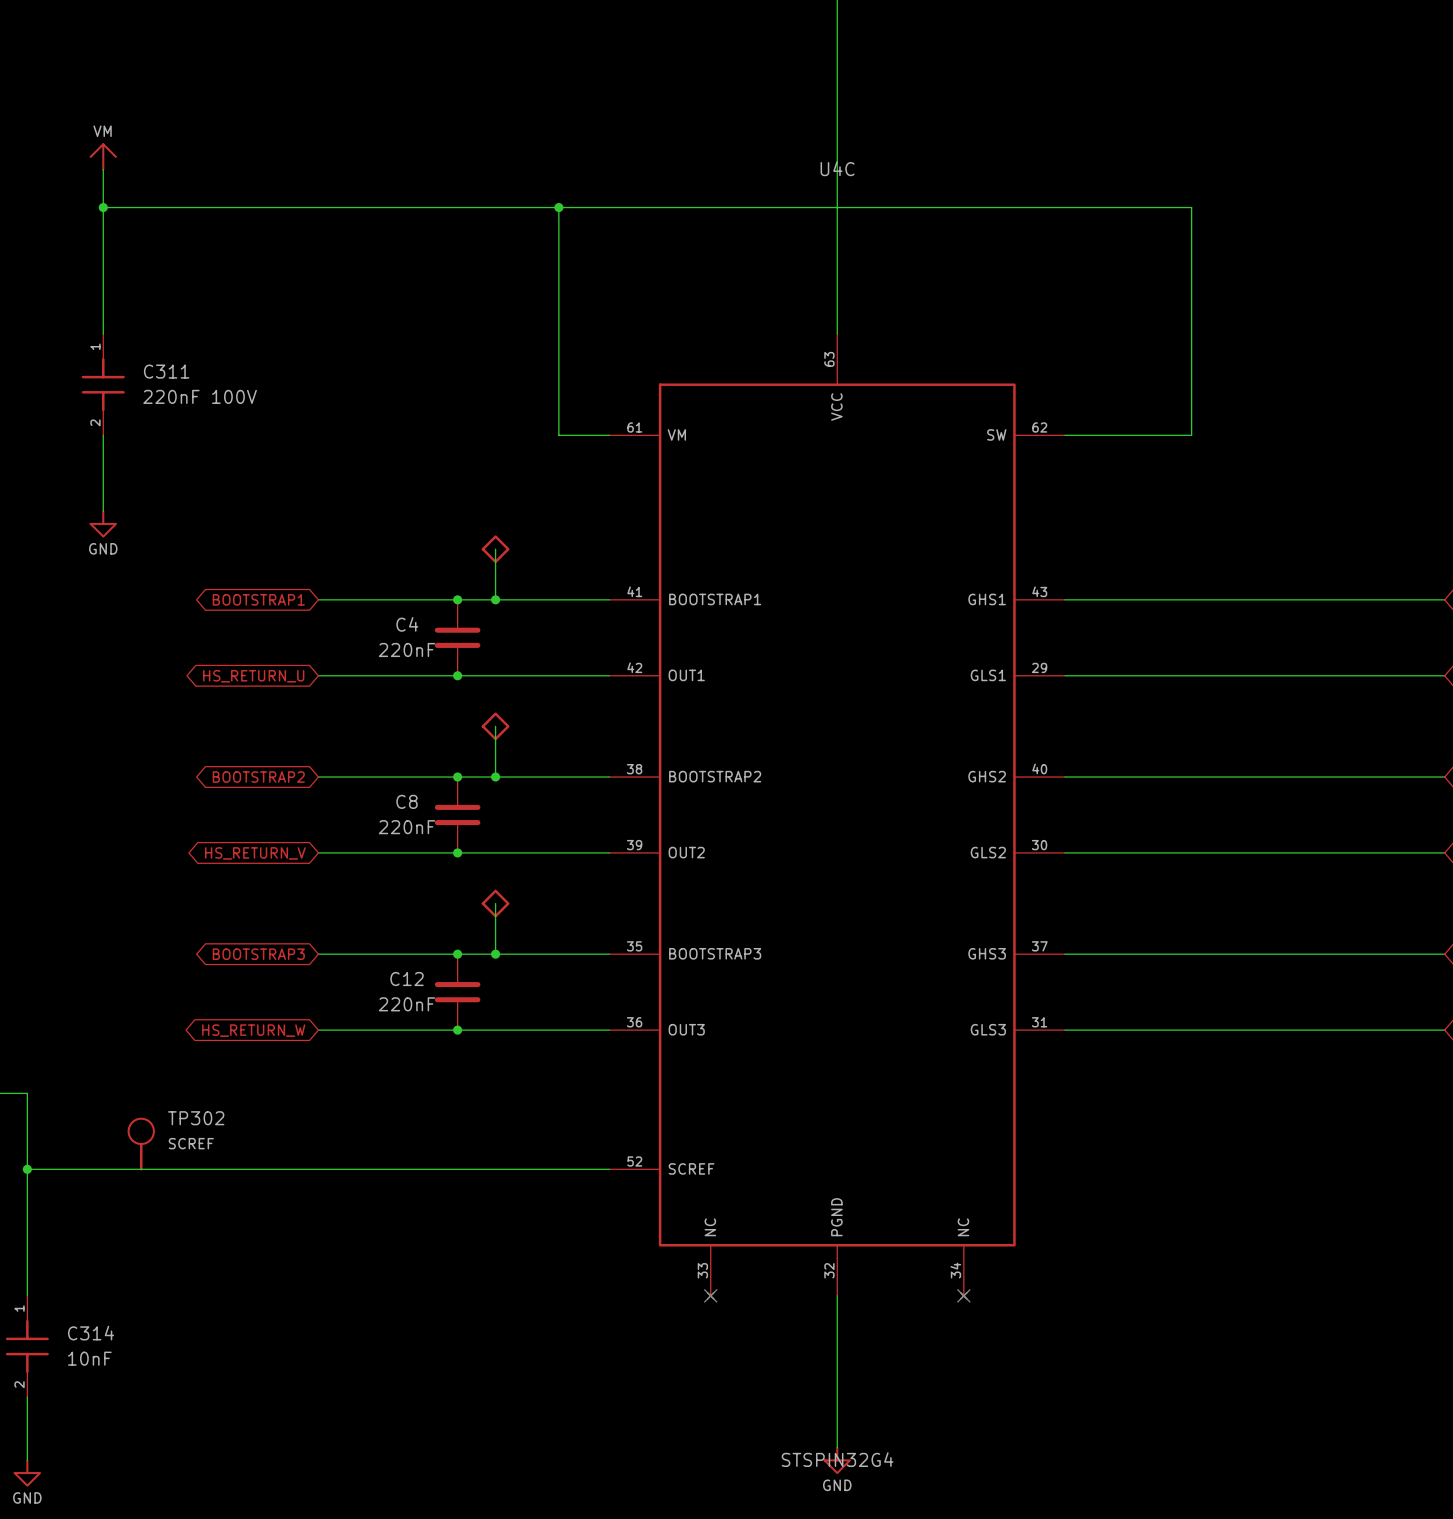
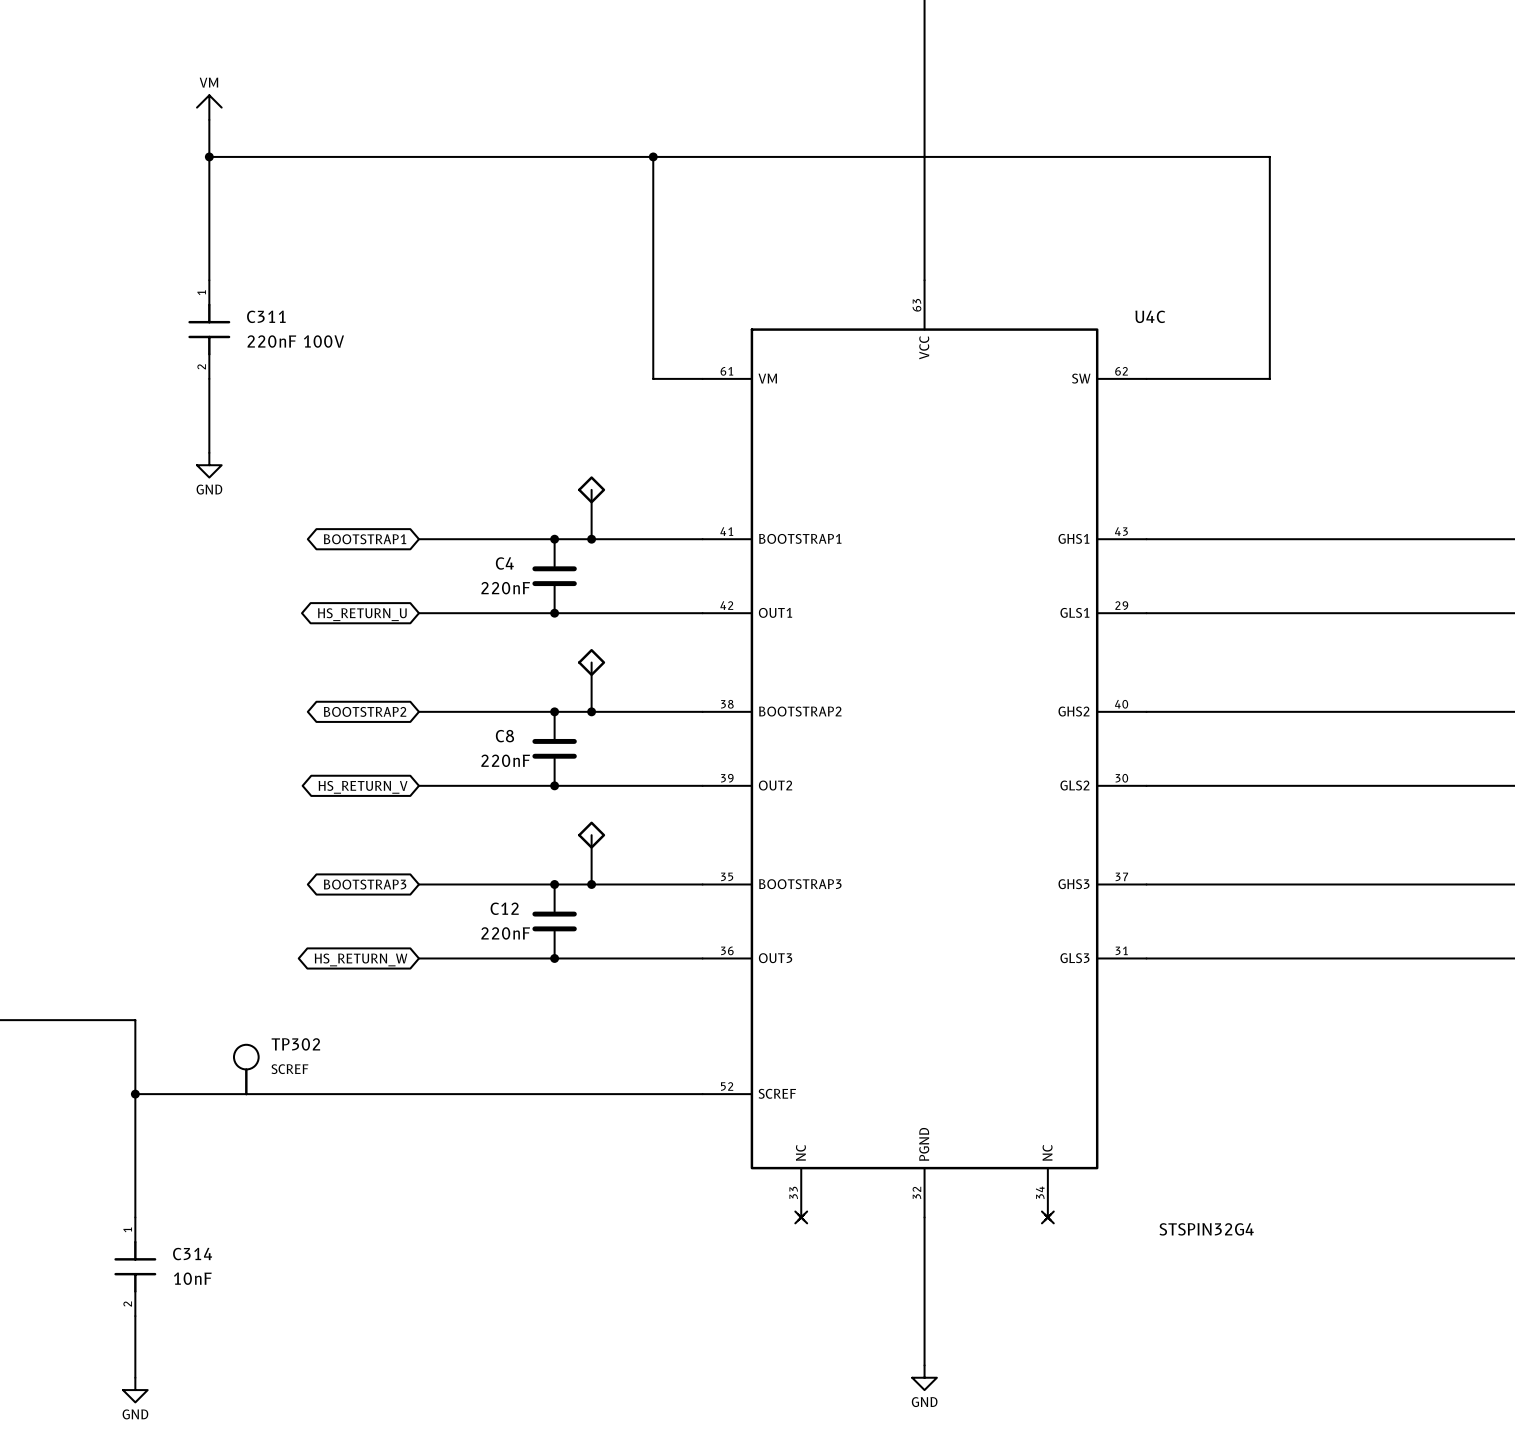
U4C name position: U4C (837, 168) -> U4C (1150, 316)
U4C value position: STSPIN32G4 (837, 1459) -> STSPIN32G4 (1206, 1229)

